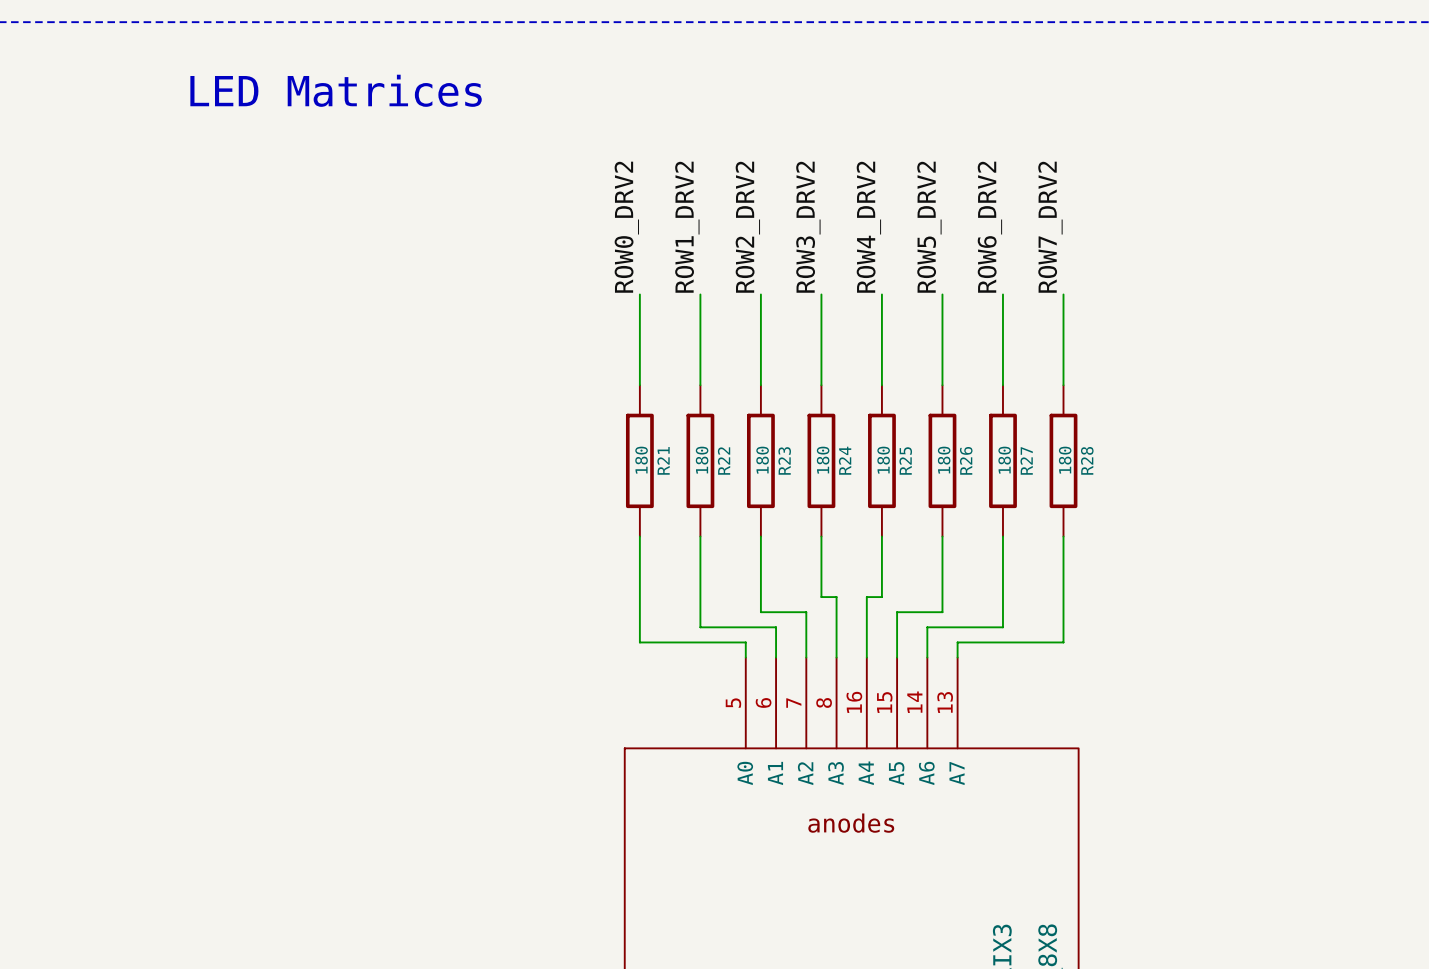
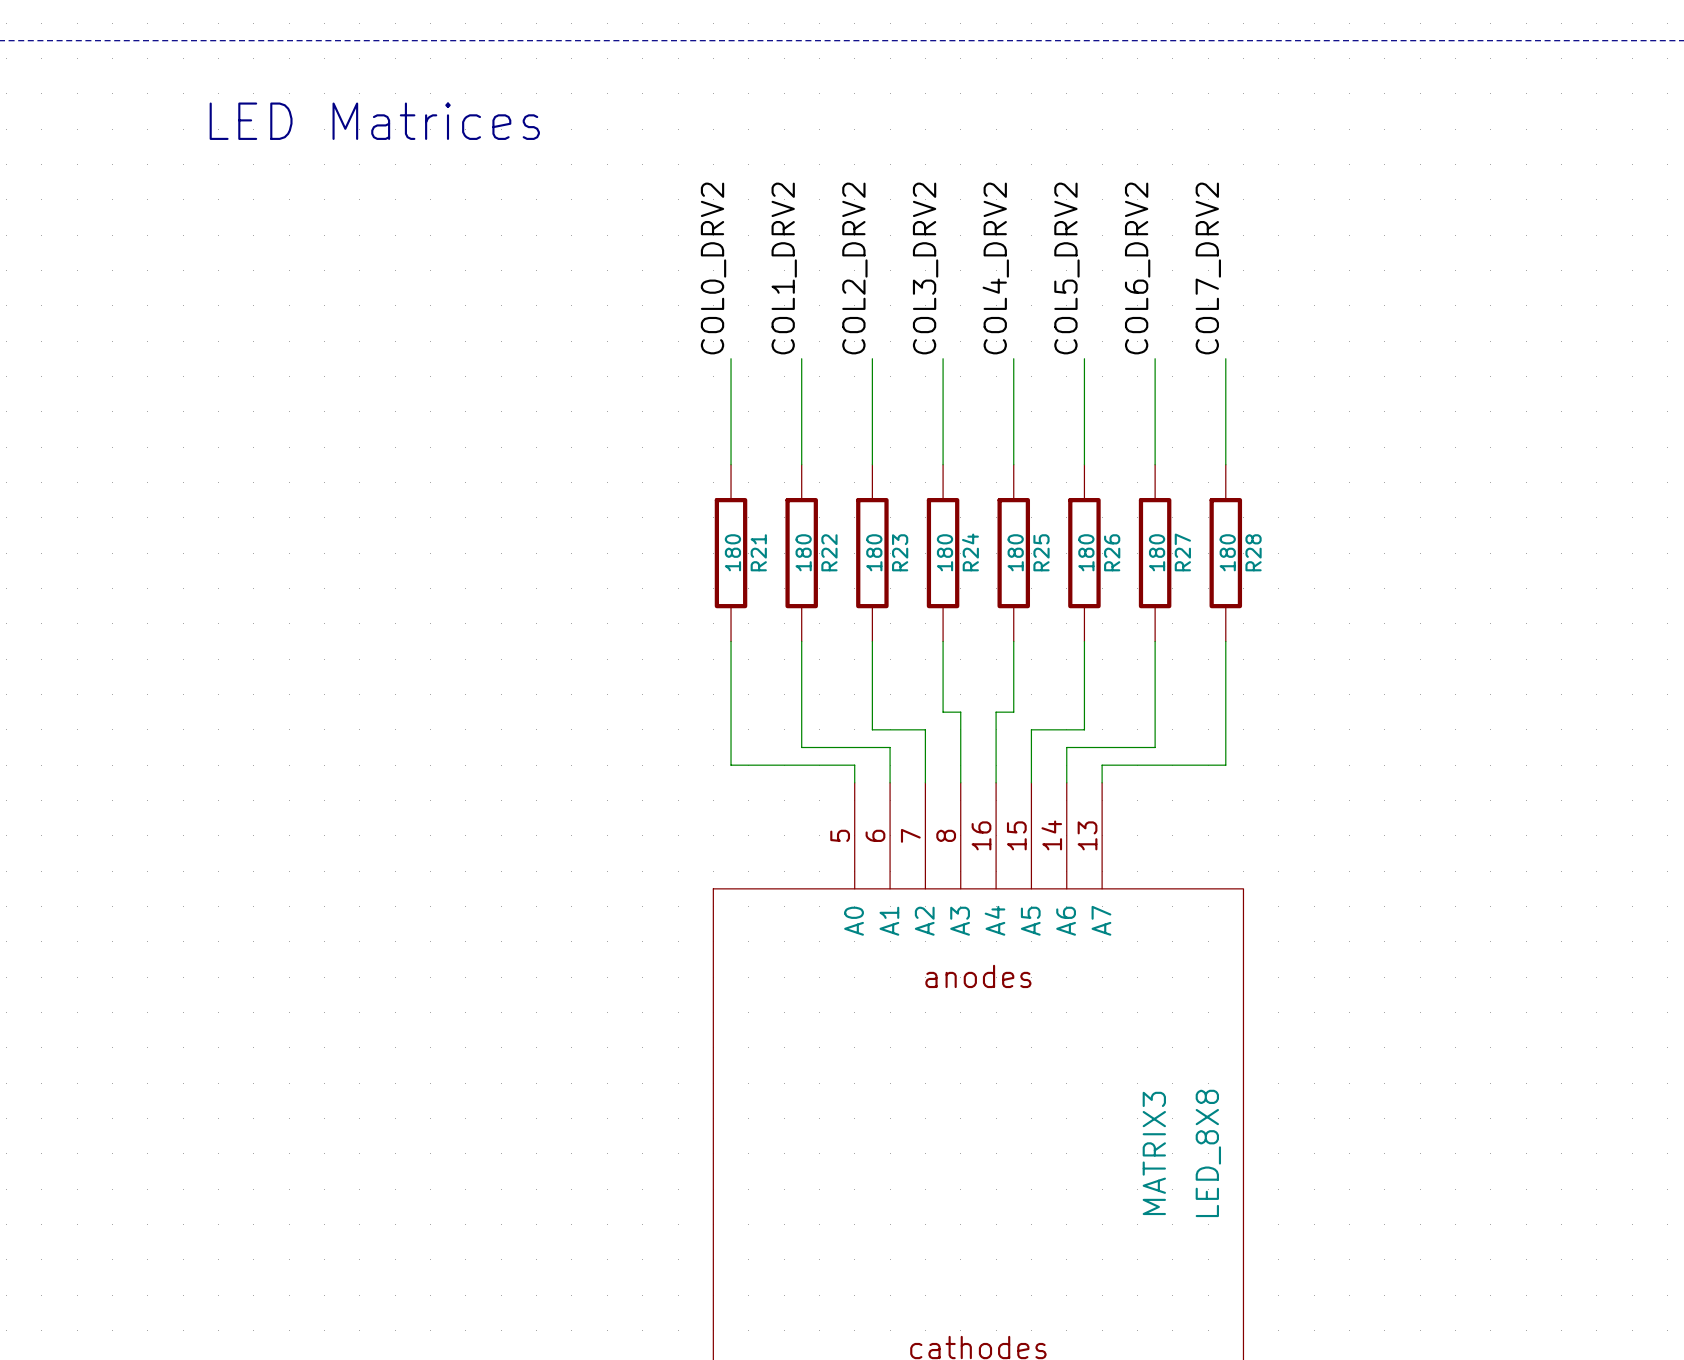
label: ROW0_DRV2 (626, 227) -> COL0_DRV2 (713, 268)
label: ROW1_DRV2 (687, 227) -> COL1_DRV2 (784, 268)
label: ROW2_DRV2 (747, 227) -> COL2_DRV2 (854, 268)
label: ROW3_DRV2 (808, 227) -> COL3_DRV2 (925, 268)
label: ROW4_DRV2 (868, 227) -> COL4_DRV2 (995, 268)
label: ROW5_DRV2 (929, 227) -> COL5_DRV2 (1066, 268)
label: ROW6_DRV2 (989, 227) -> COL6_DRV2 (1137, 268)
label: ROW7_DRV2 (1050, 227) -> COL7_DRV2 (1208, 268)

